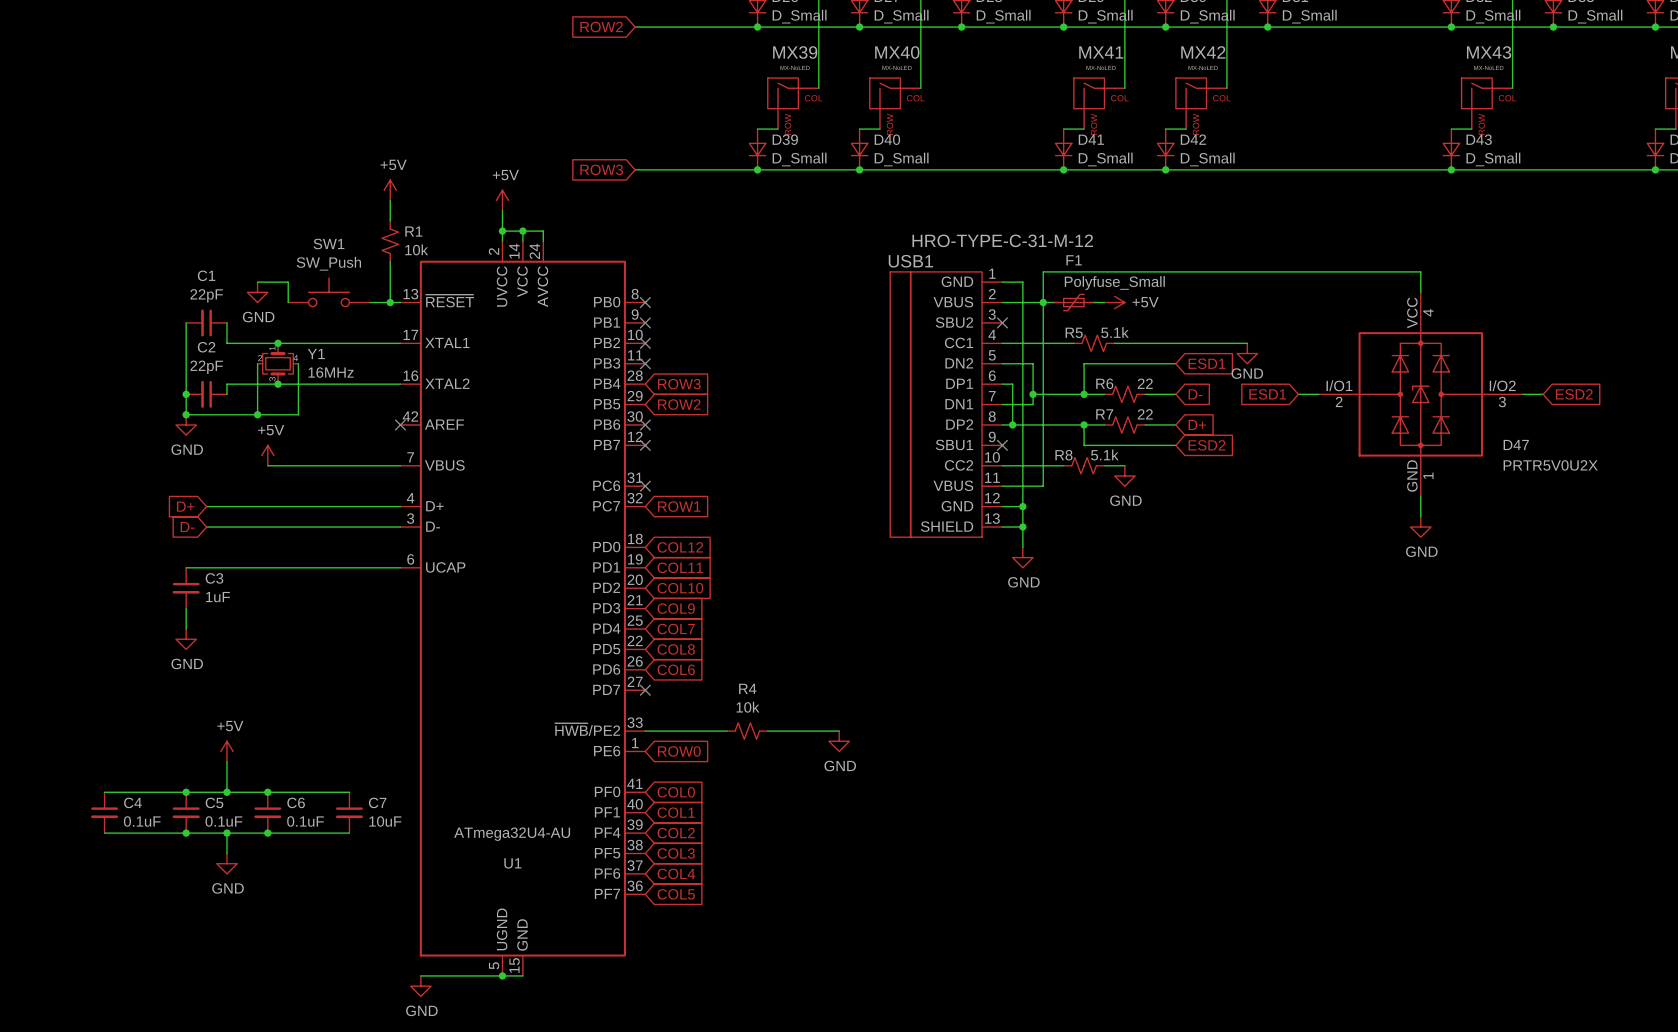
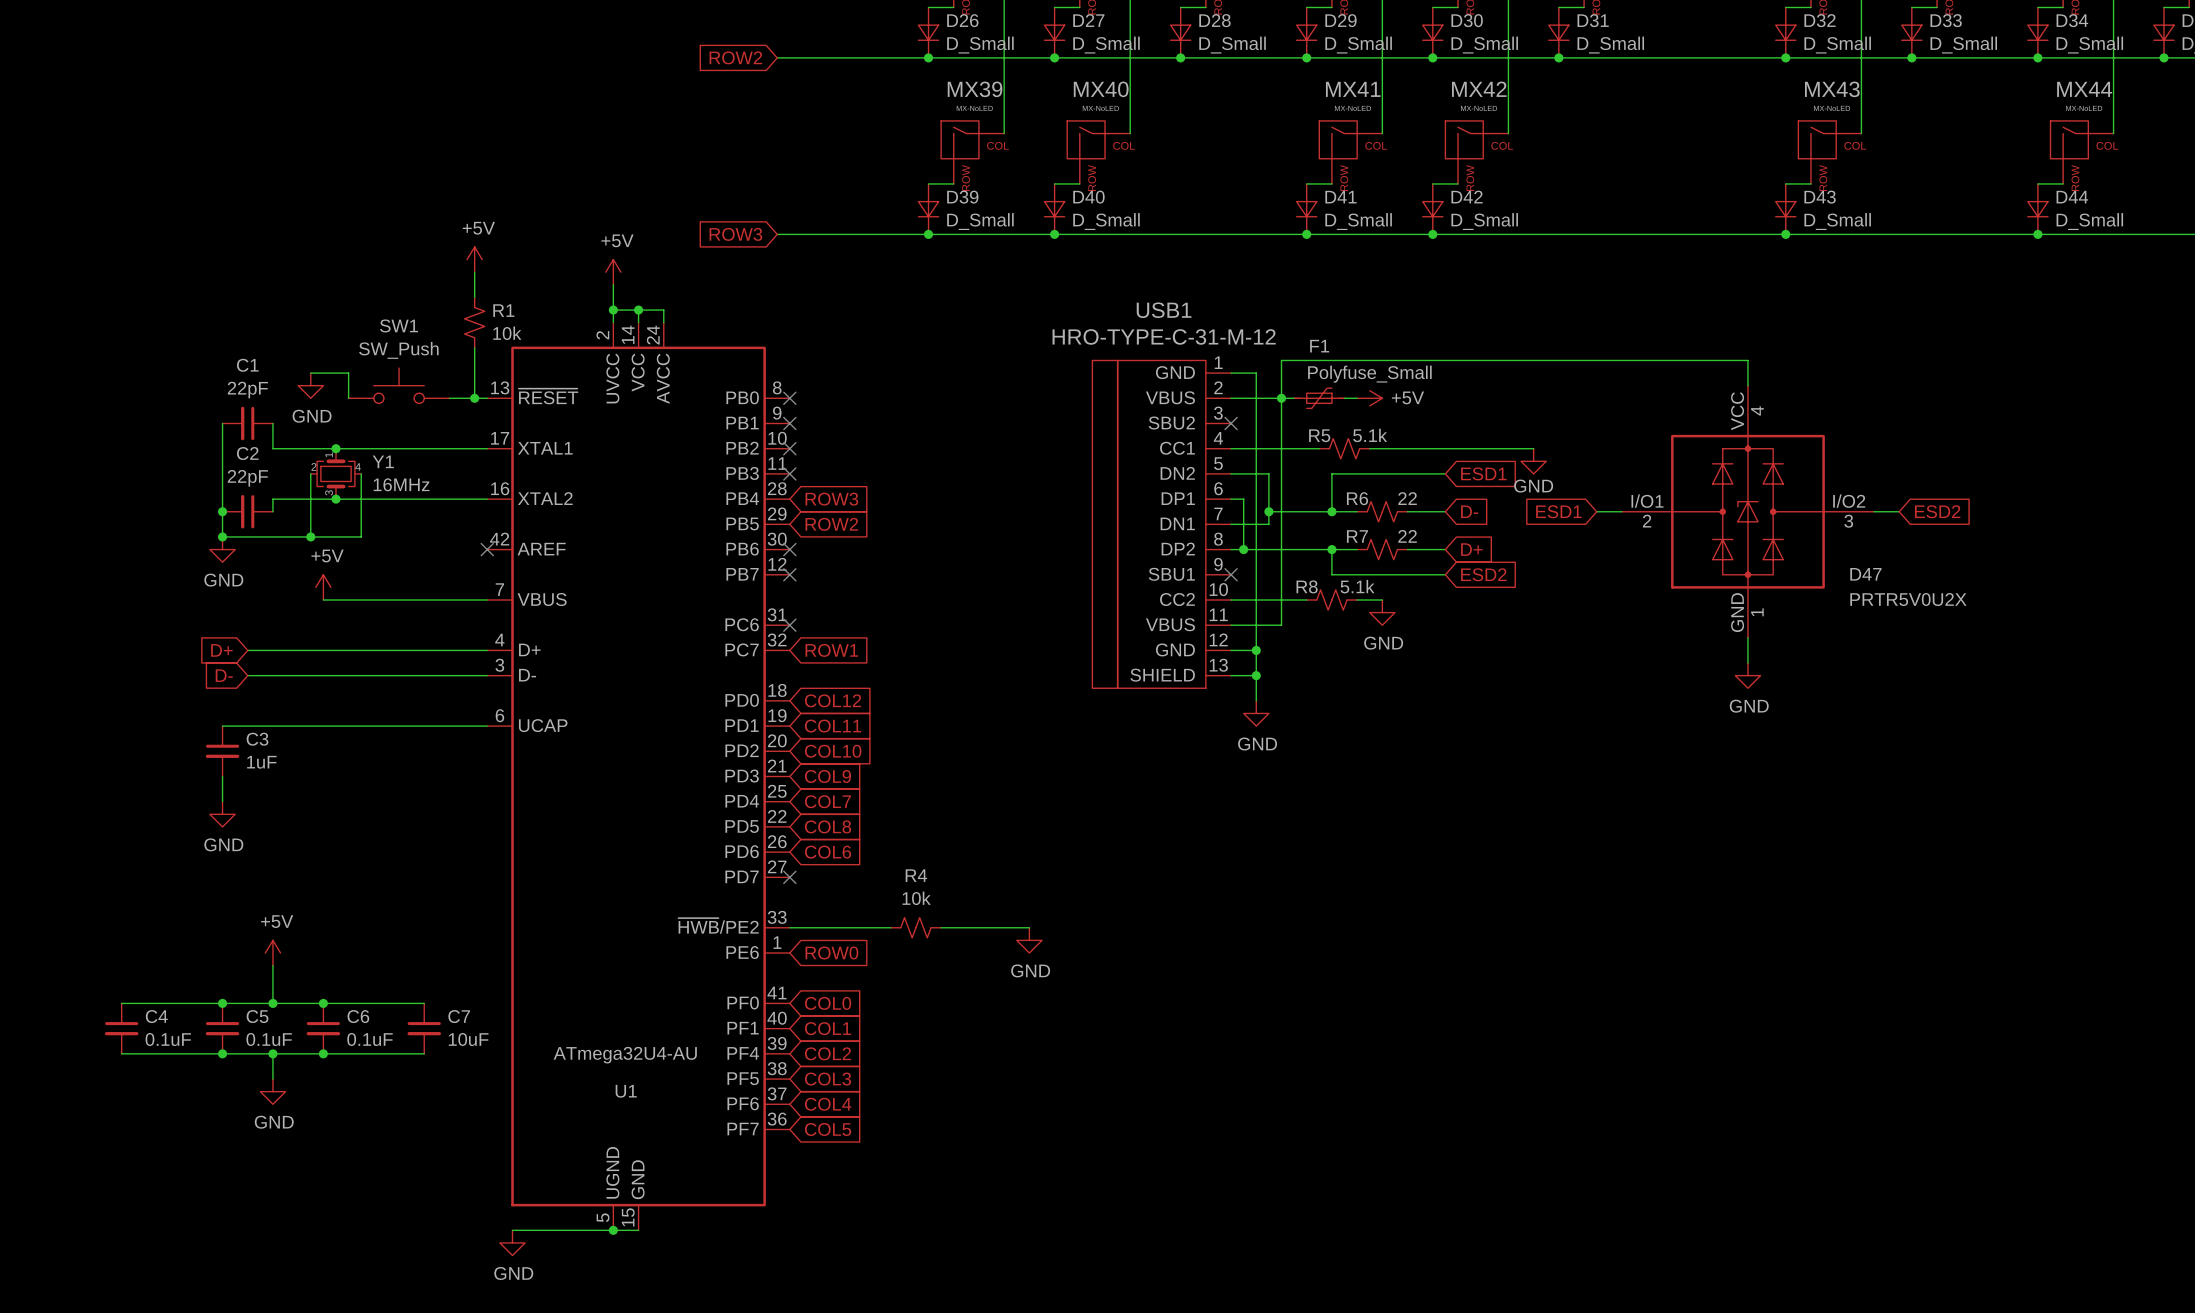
USB1 value position: HRO-TYPE-C-31-M-12 (1002, 240) -> HRO-TYPE-C-31-M-12 (1164, 336)
USB1 name position: USB1 (910, 261) -> USB1 (1164, 310)

